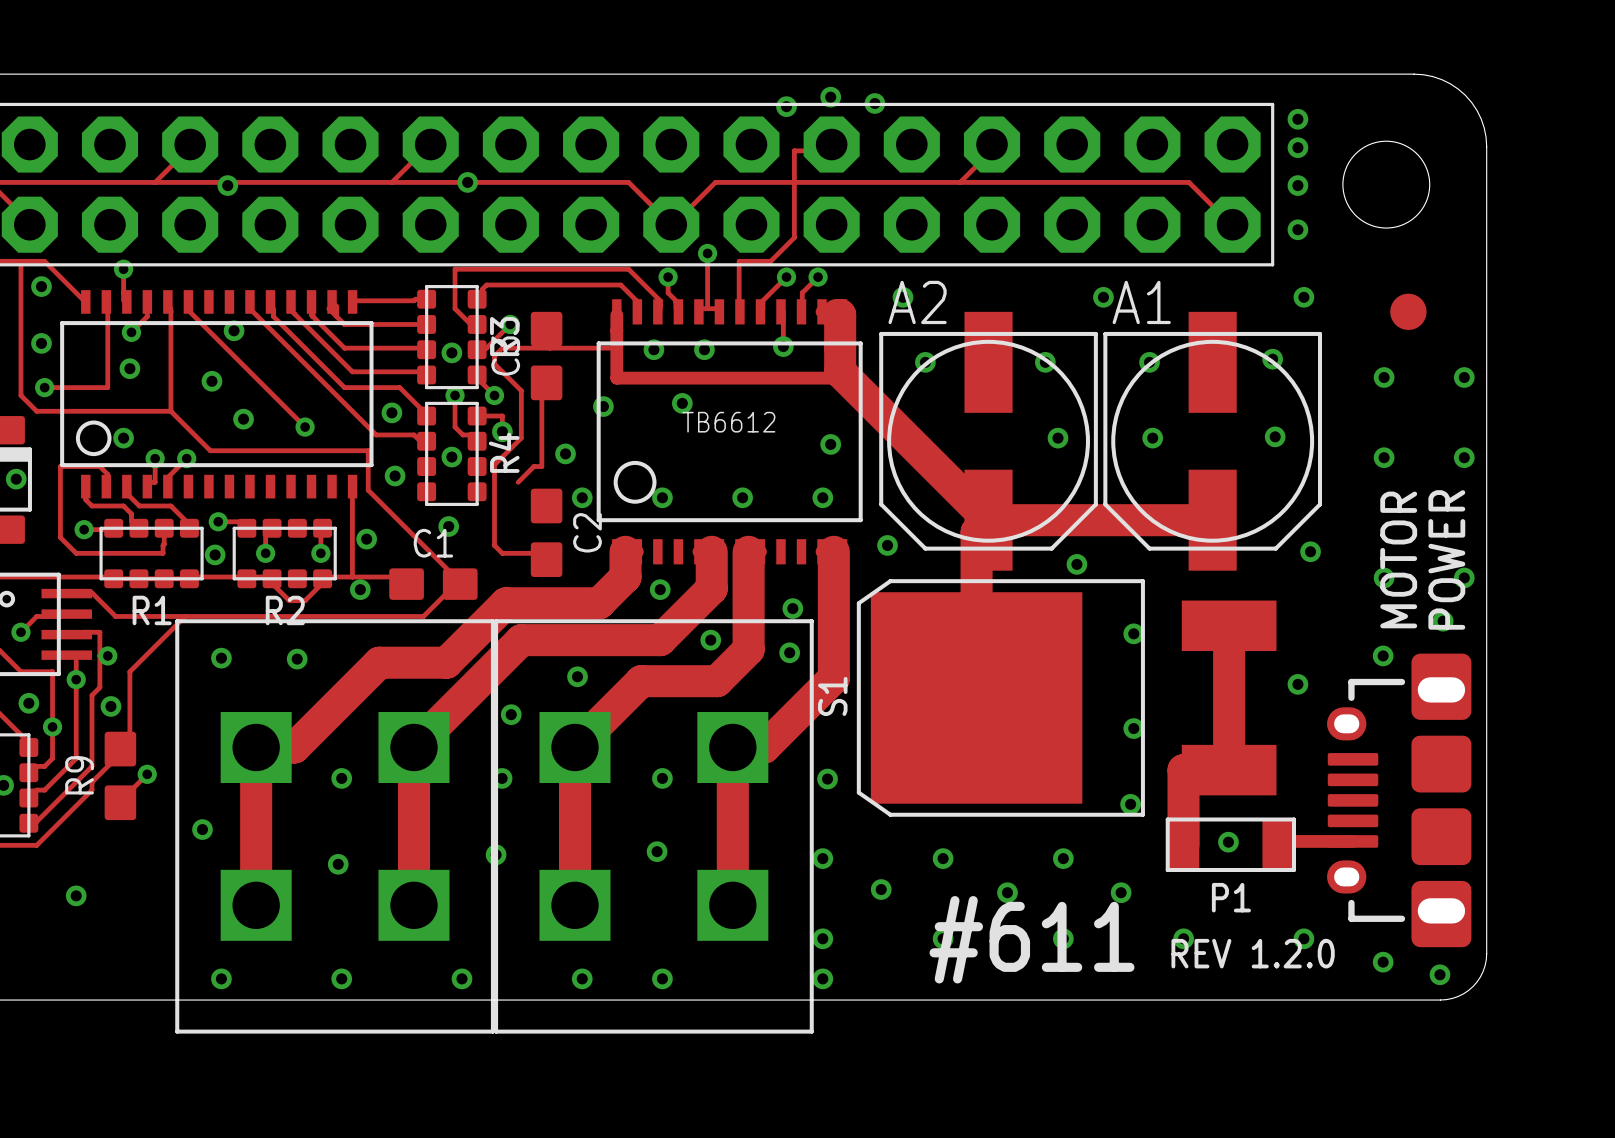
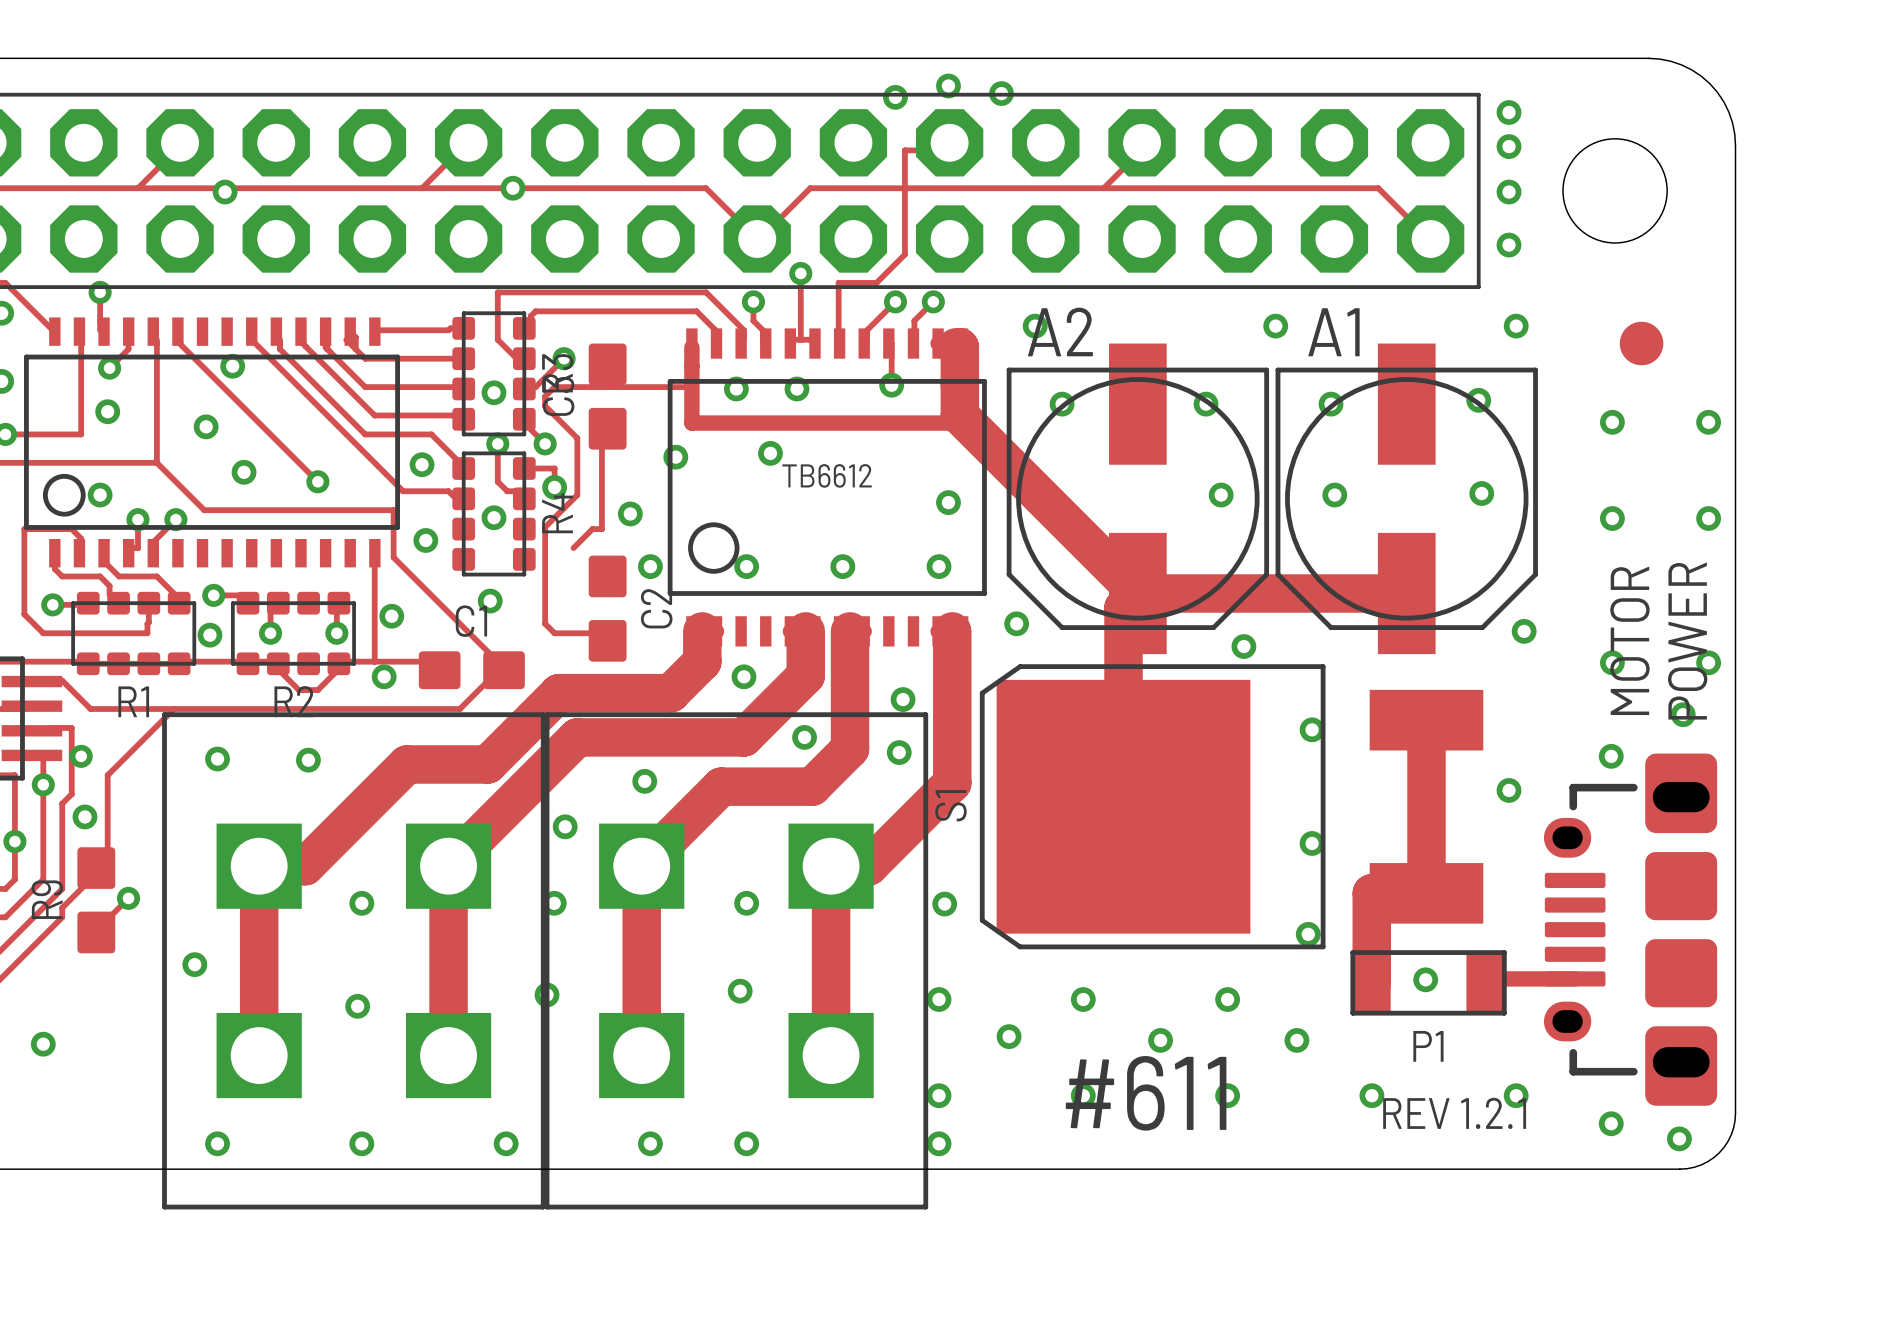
text: REV 1.2.0 (1253, 953) -> REV 1.2.1 (1454, 1113)

